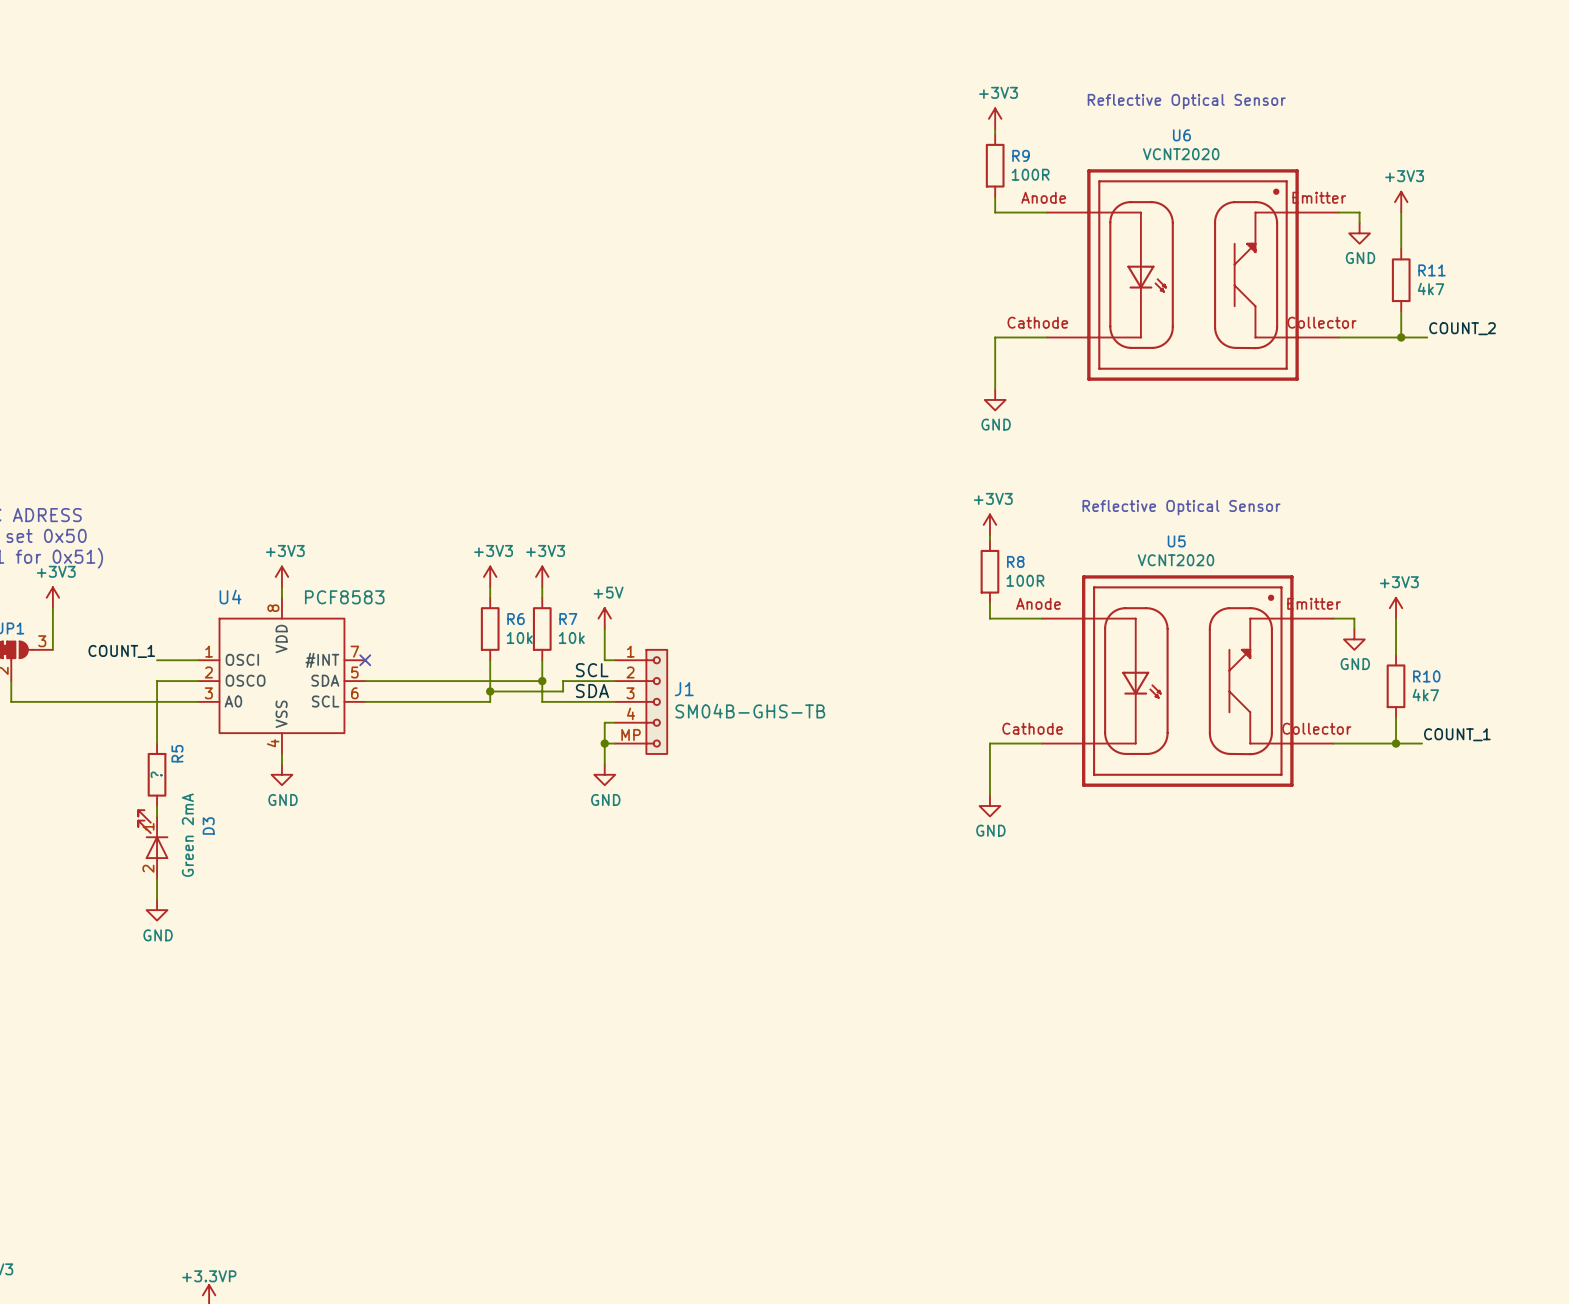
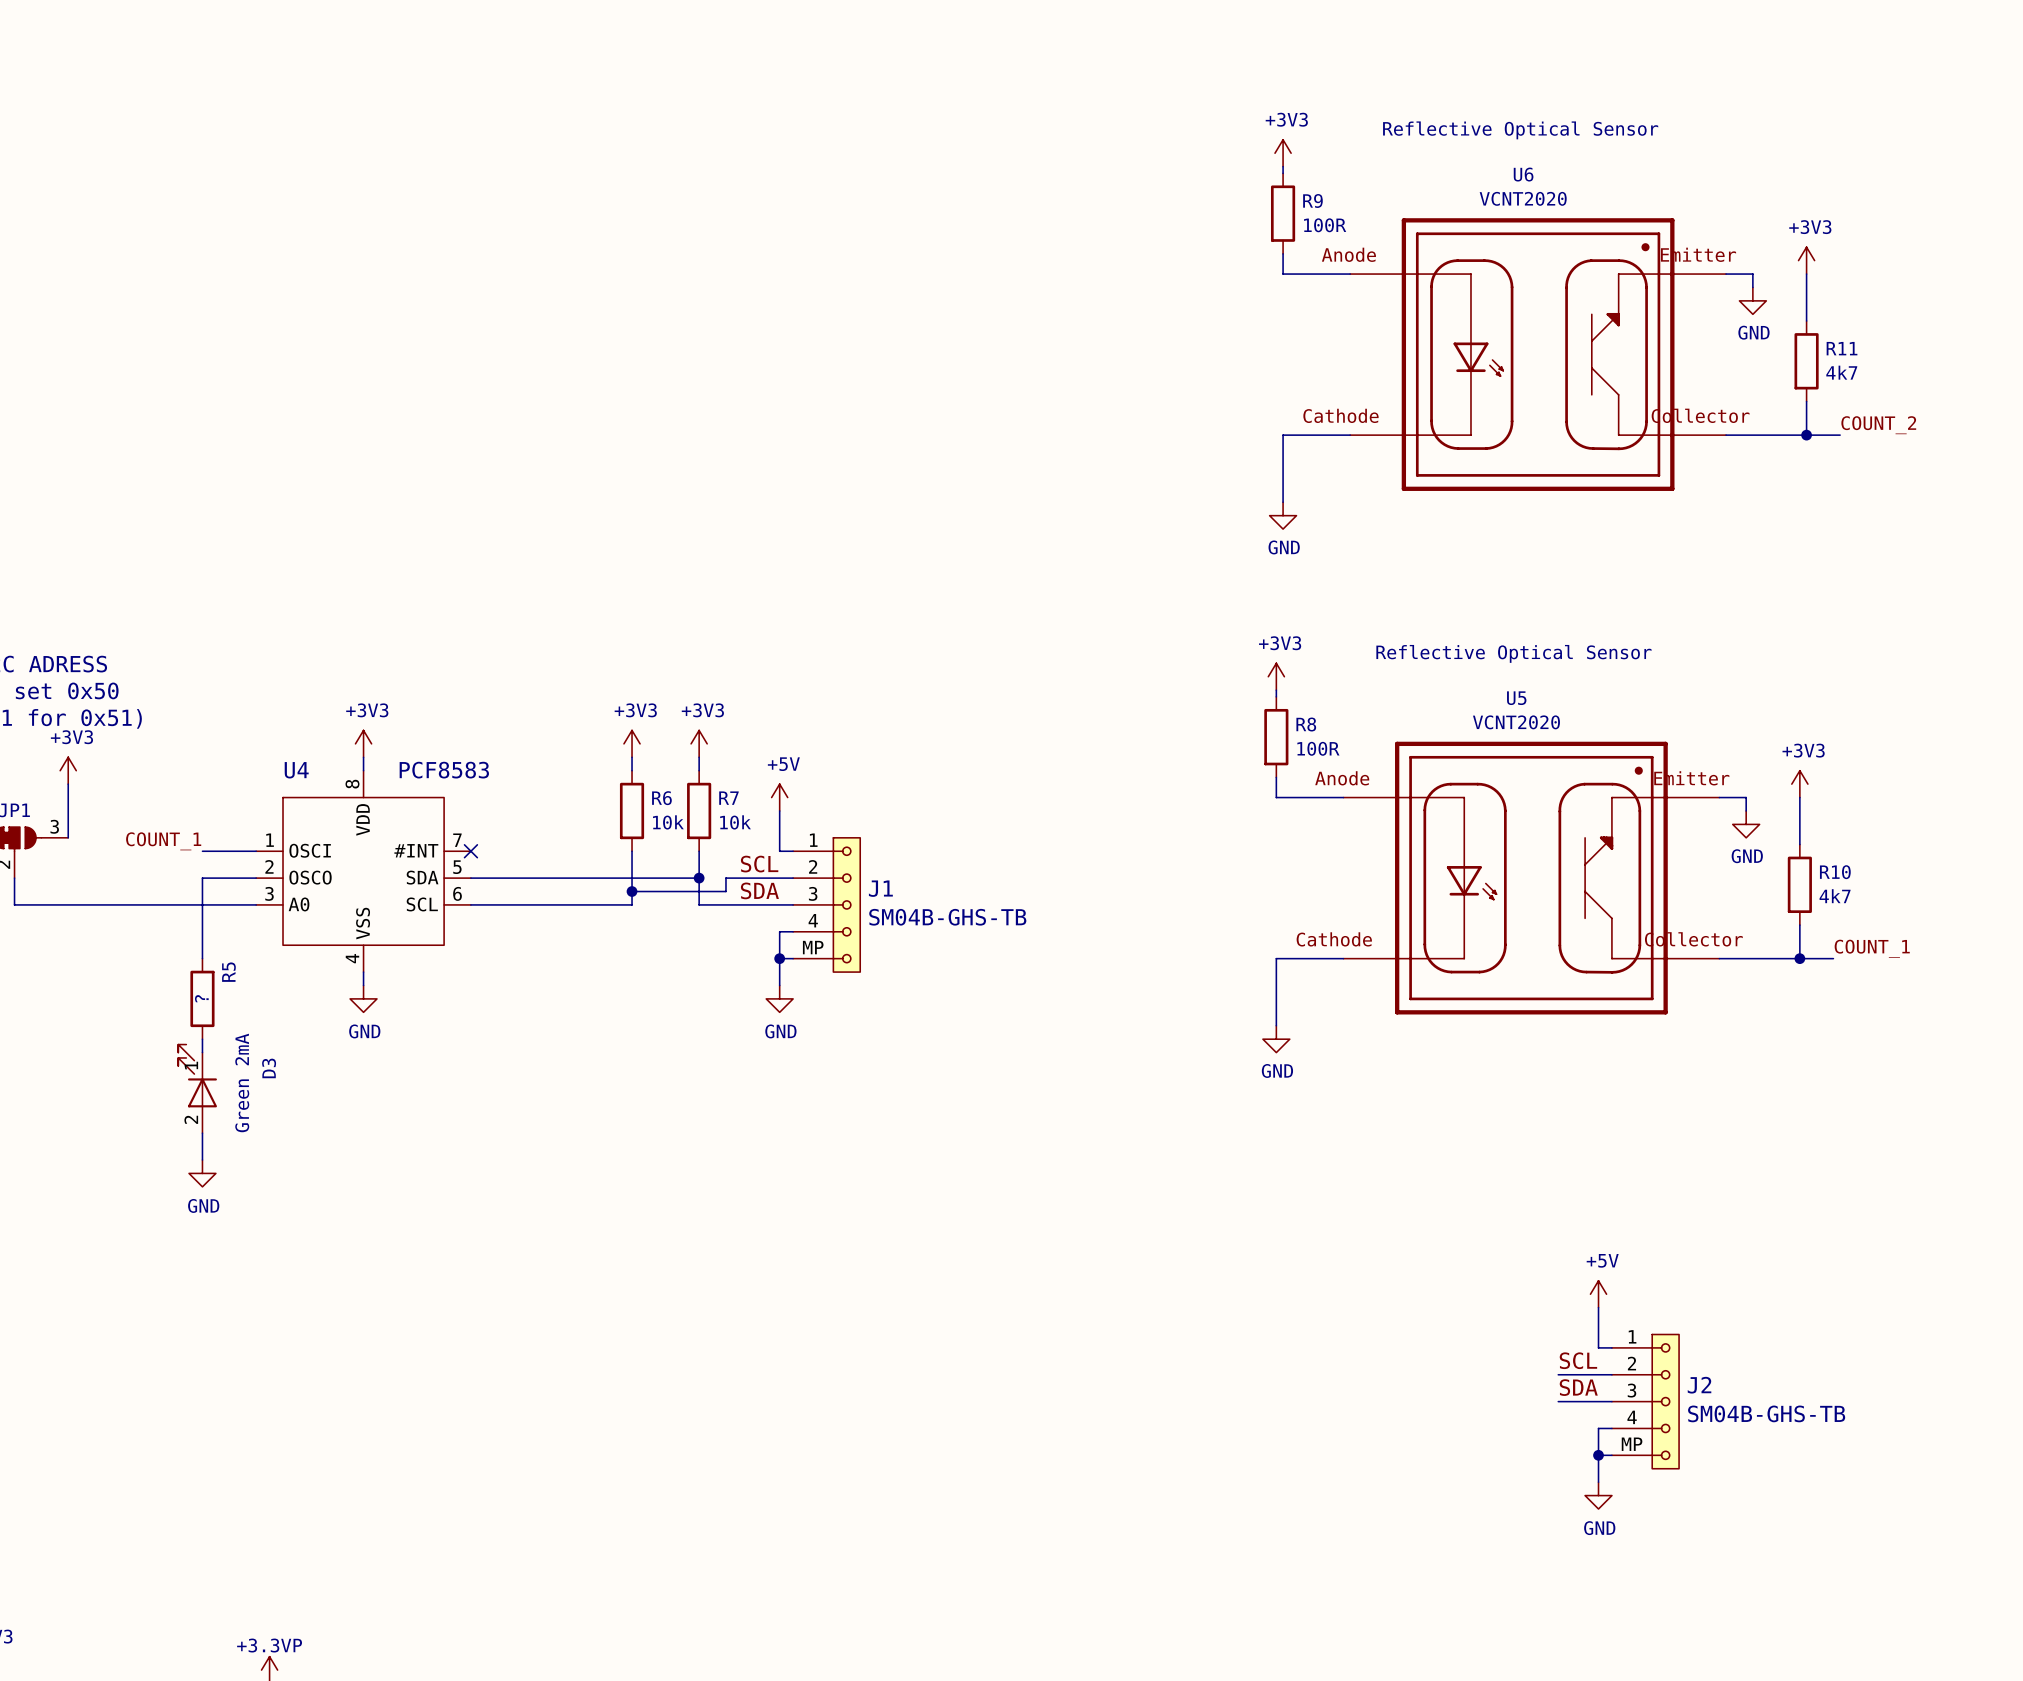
power symbol: none -> +5V (1598, 1294)
wire: none -> (1598, 1307) (1598, 1347) (1611, 1347)
label: none -> SCL (1578, 1360)
wire: none -> (1558, 1374) (1611, 1374)
label: none -> SDA (1578, 1387)
wire: none -> (1558, 1401) (1611, 1401)
J2: none -> SM04B-GHS-TB (1645, 1401)
wire: none -> (1611, 1428) (1598, 1428) (1598, 1482)
wire: none -> (1598, 1455) (1611, 1455)
junction: none -> (1598, 1455)
power symbol: none -> GND (1598, 1495)

